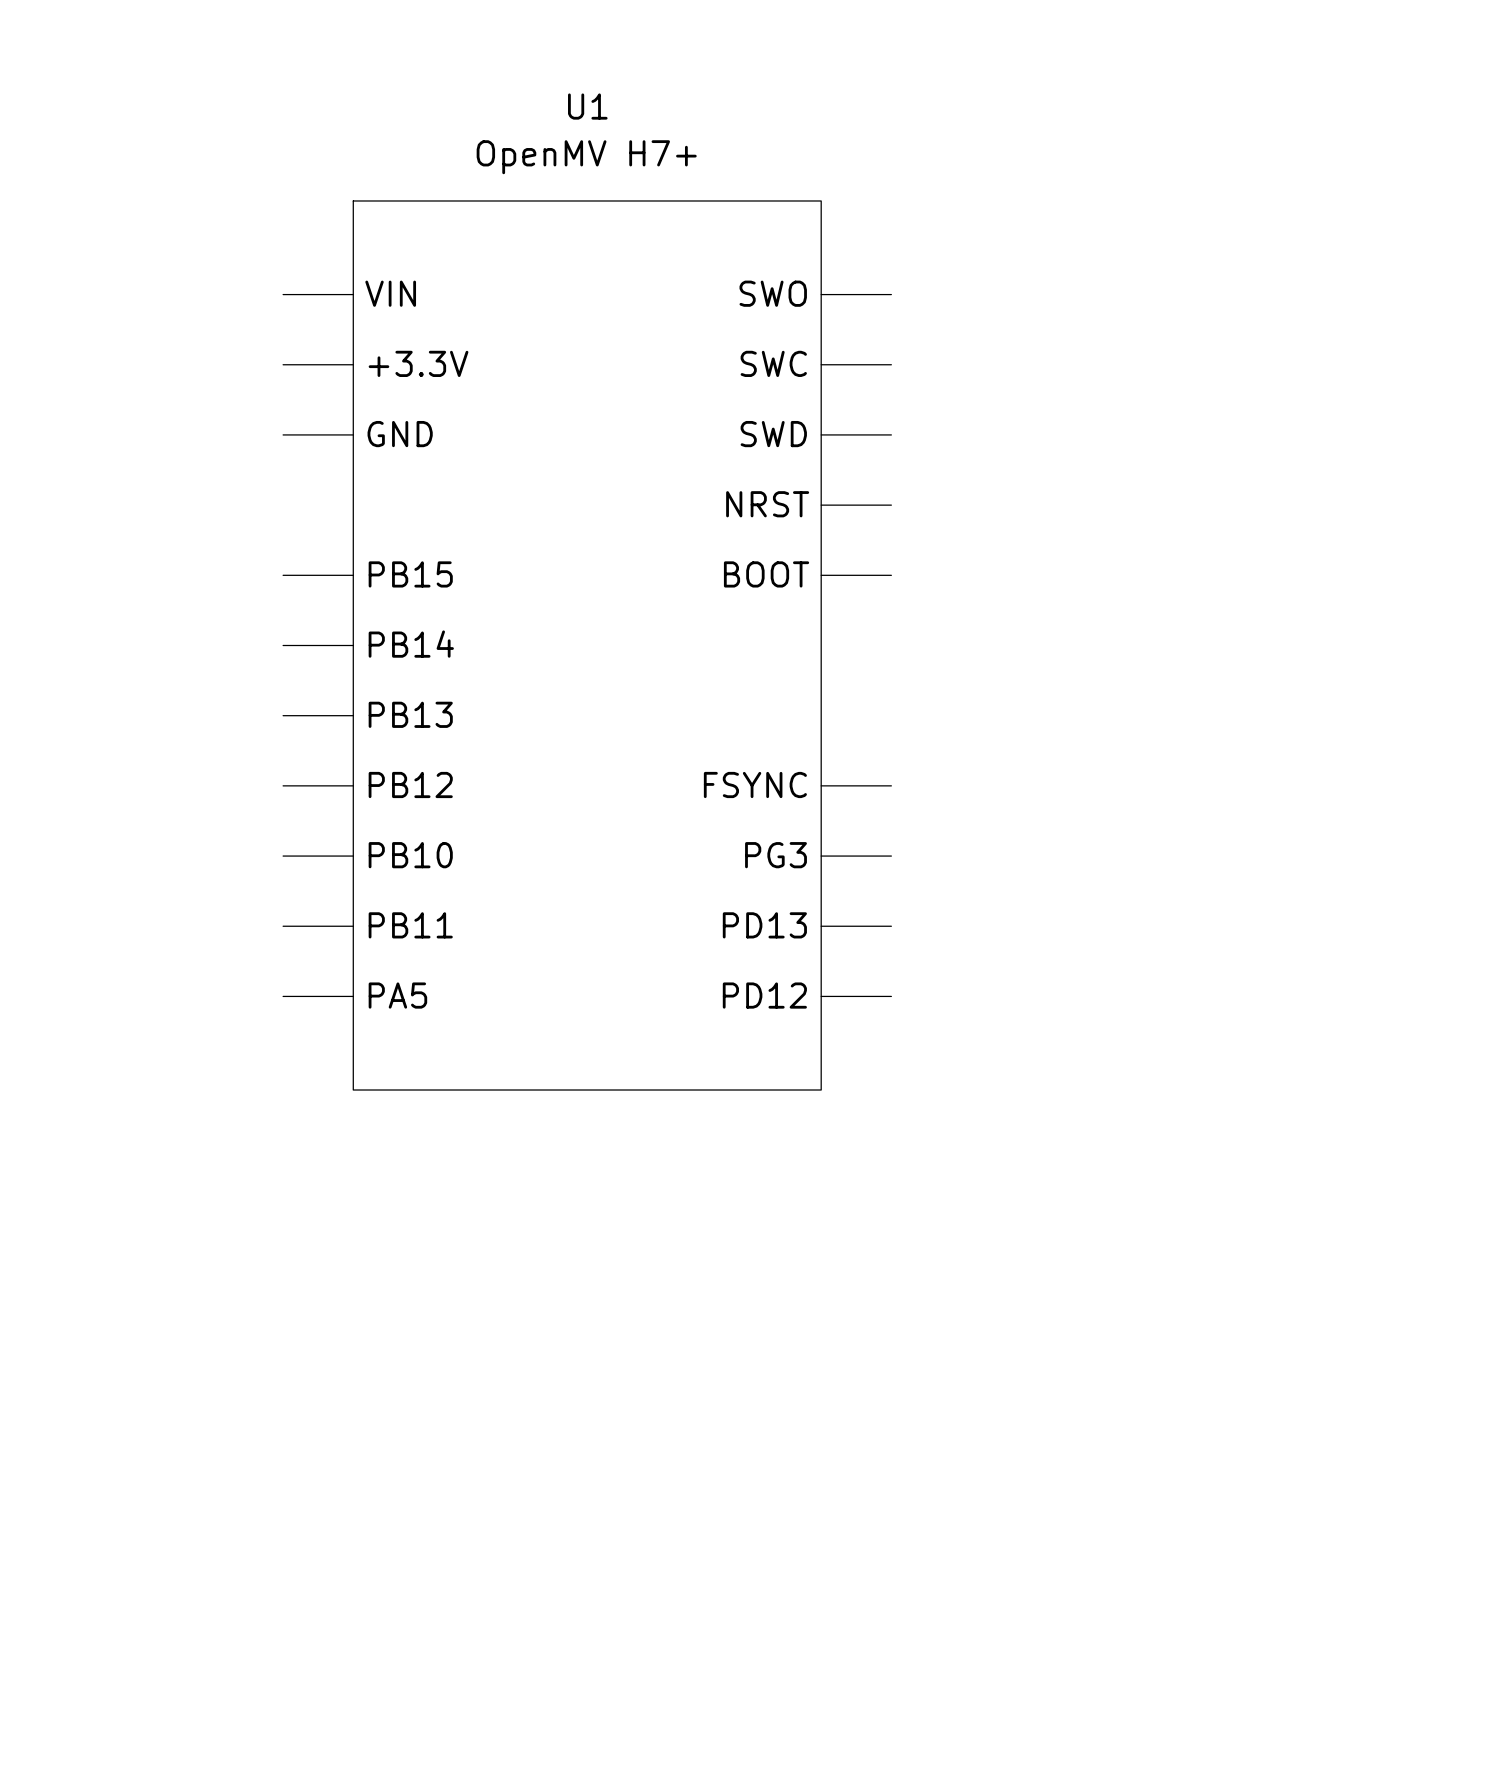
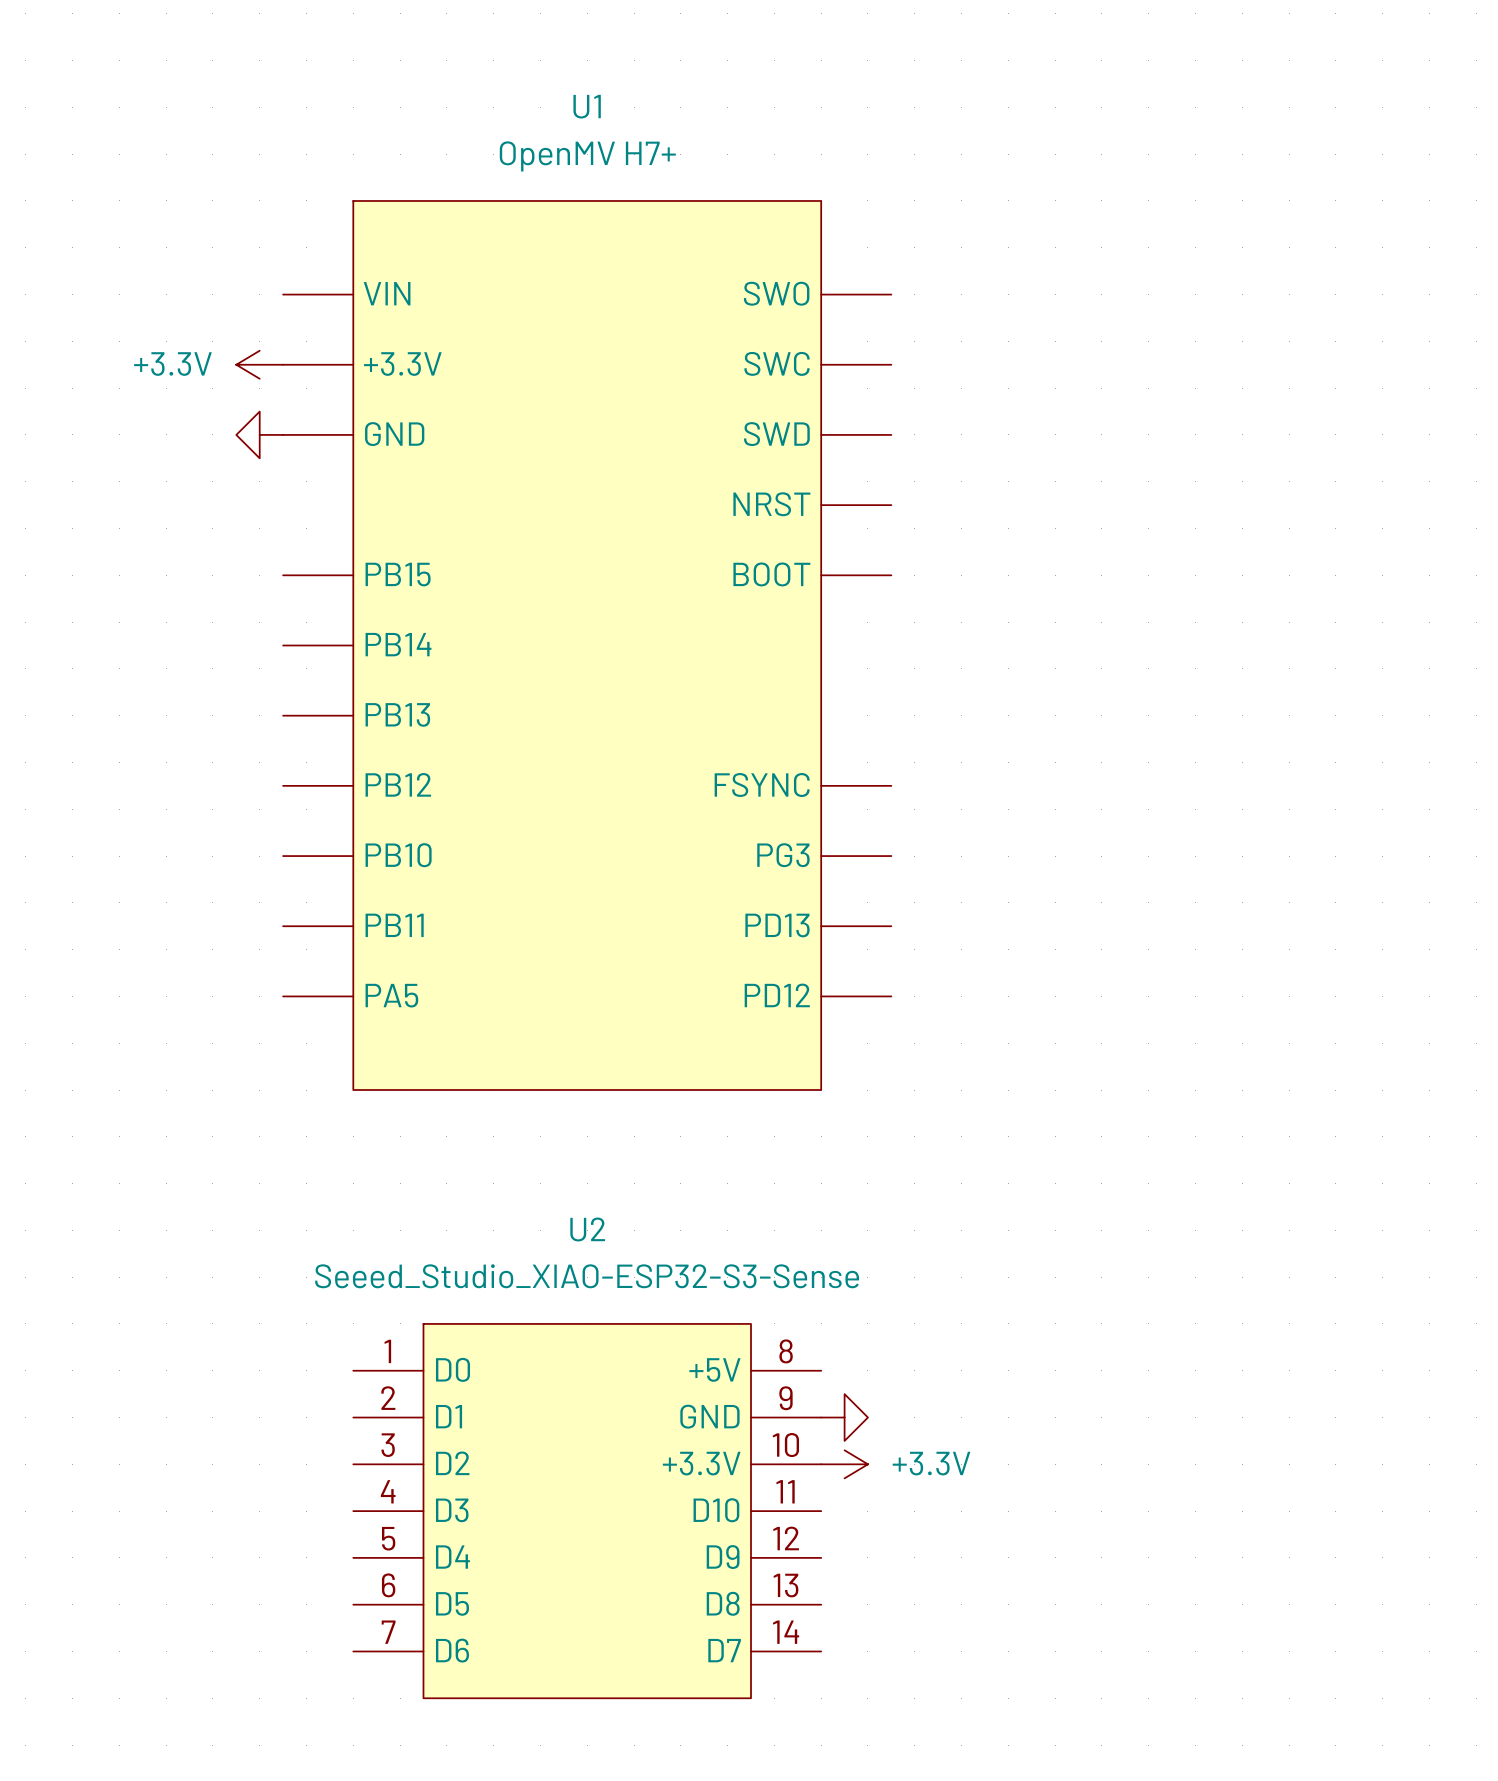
power symbol: none -> +3.3V (259, 364)
power symbol: none -> (259, 434)
power symbol: none -> (844, 1417)
power symbol: none -> +3.3V (844, 1464)
U2: none -> Seeed_Studio_XIAO-ESP32-S3-Sense (587, 1511)

